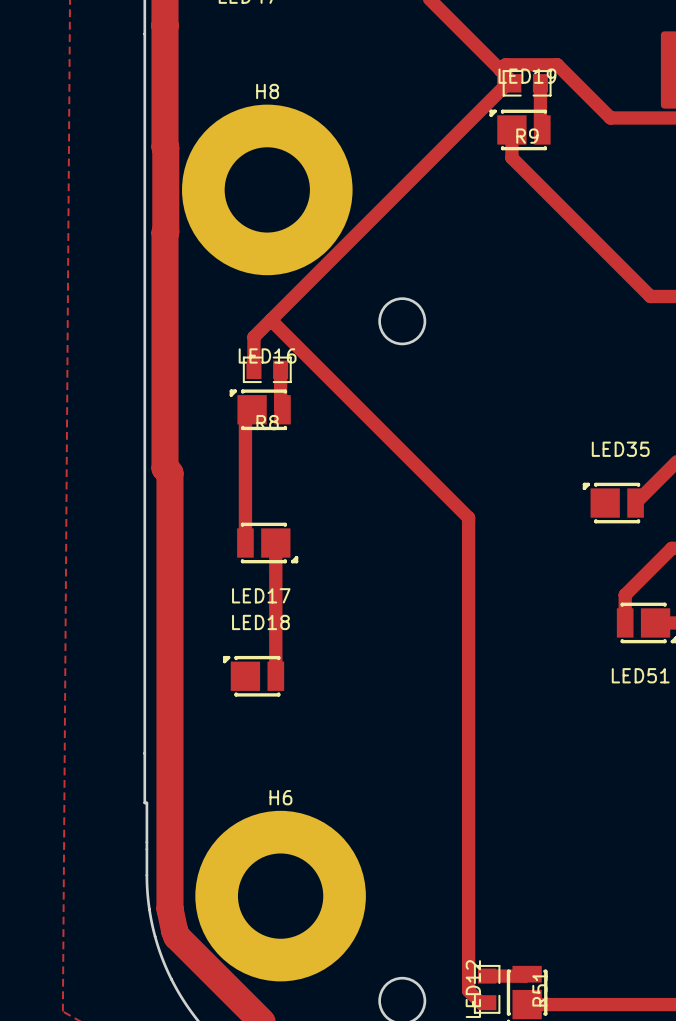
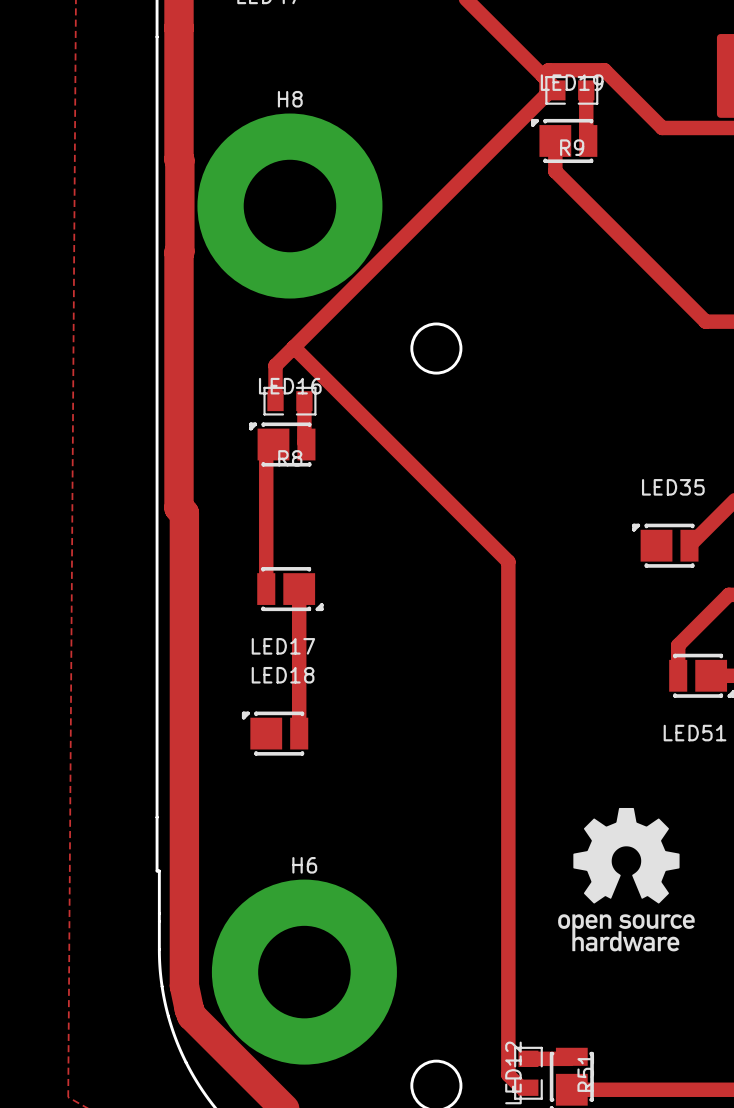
drawing: none -> [558, 807, 695, 952]

